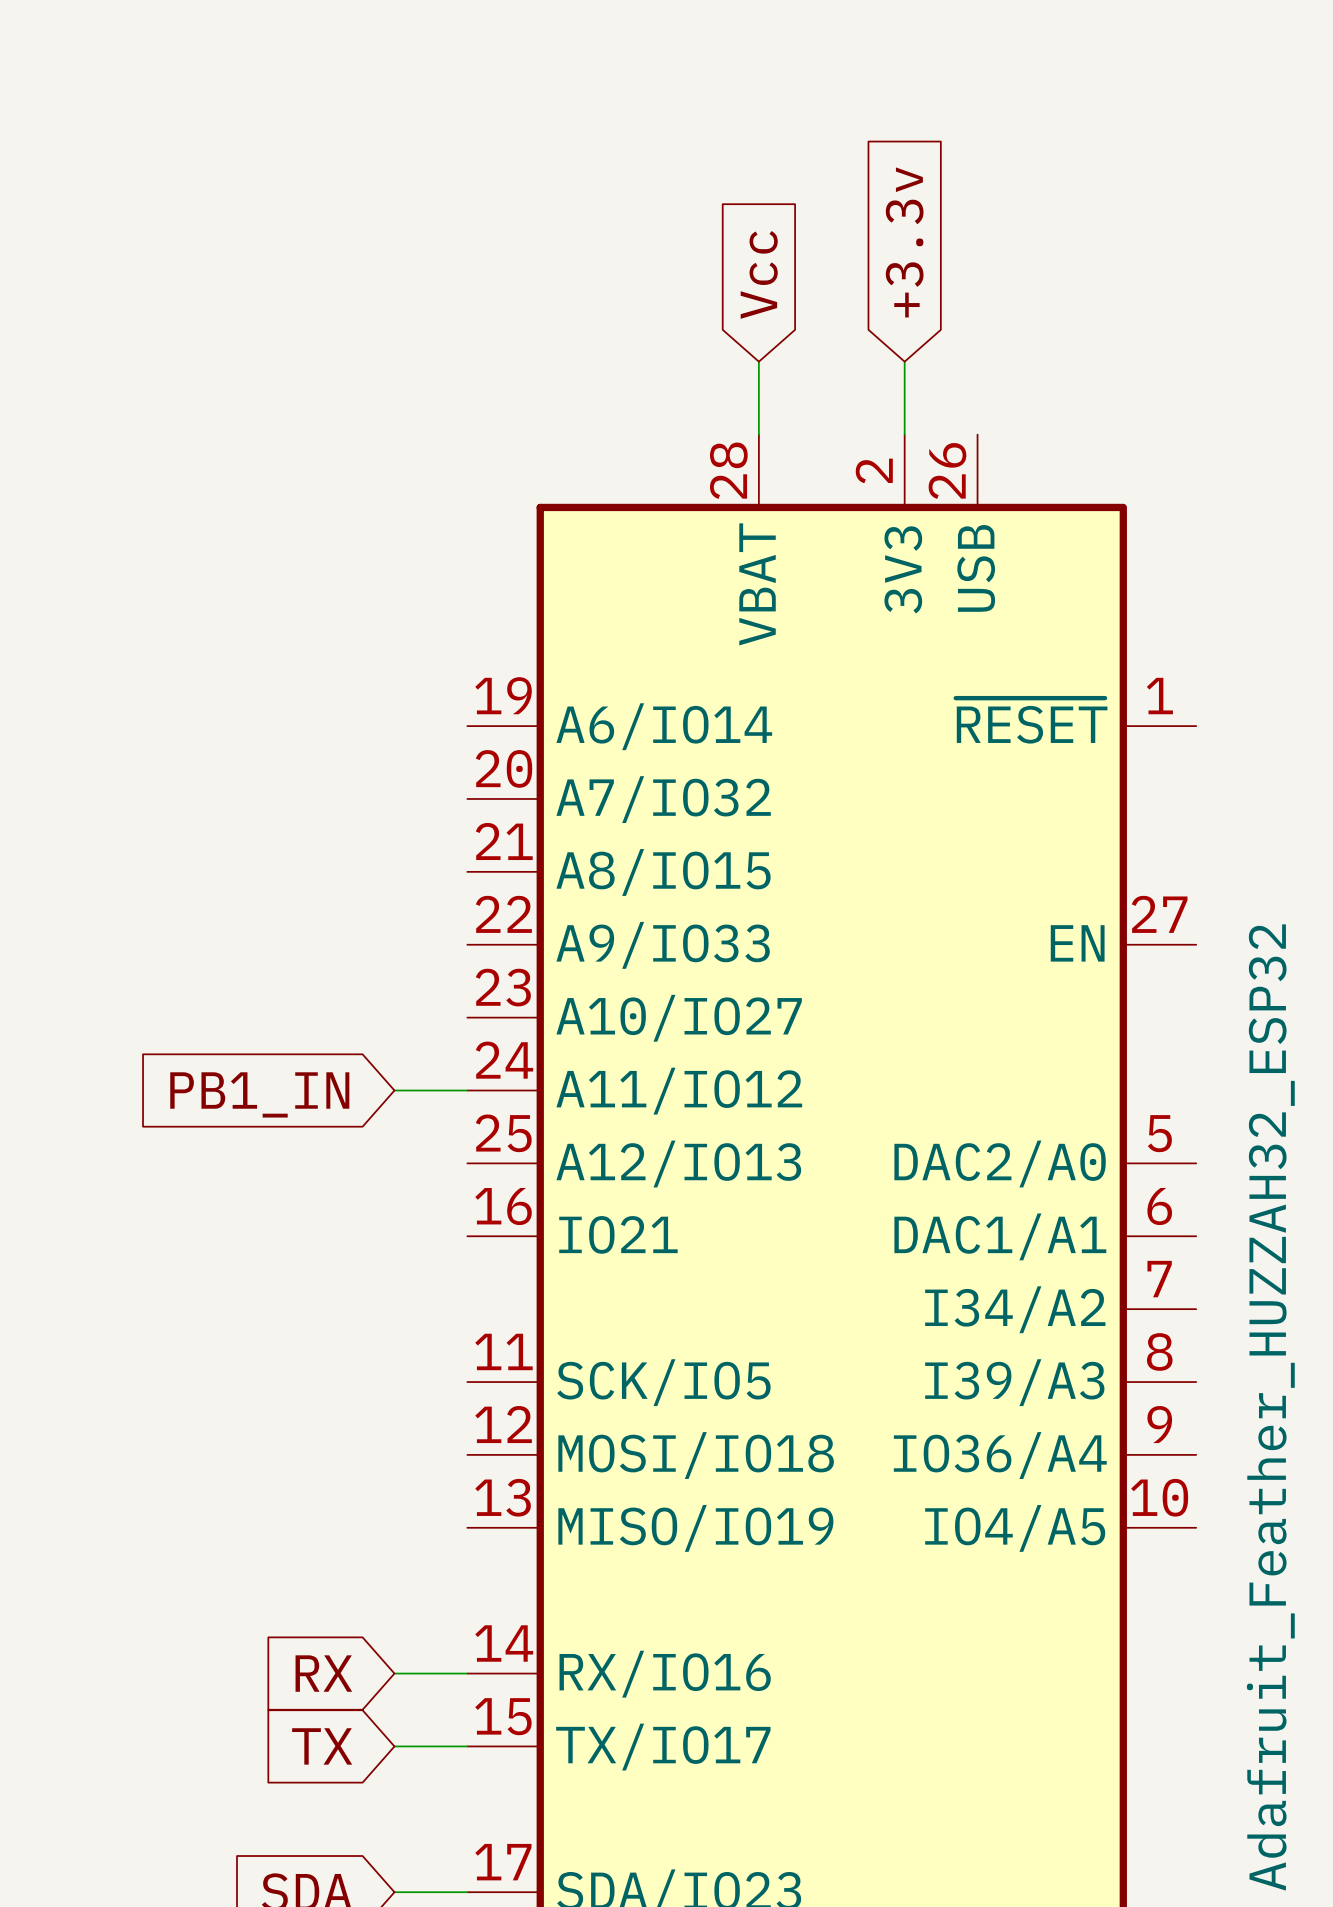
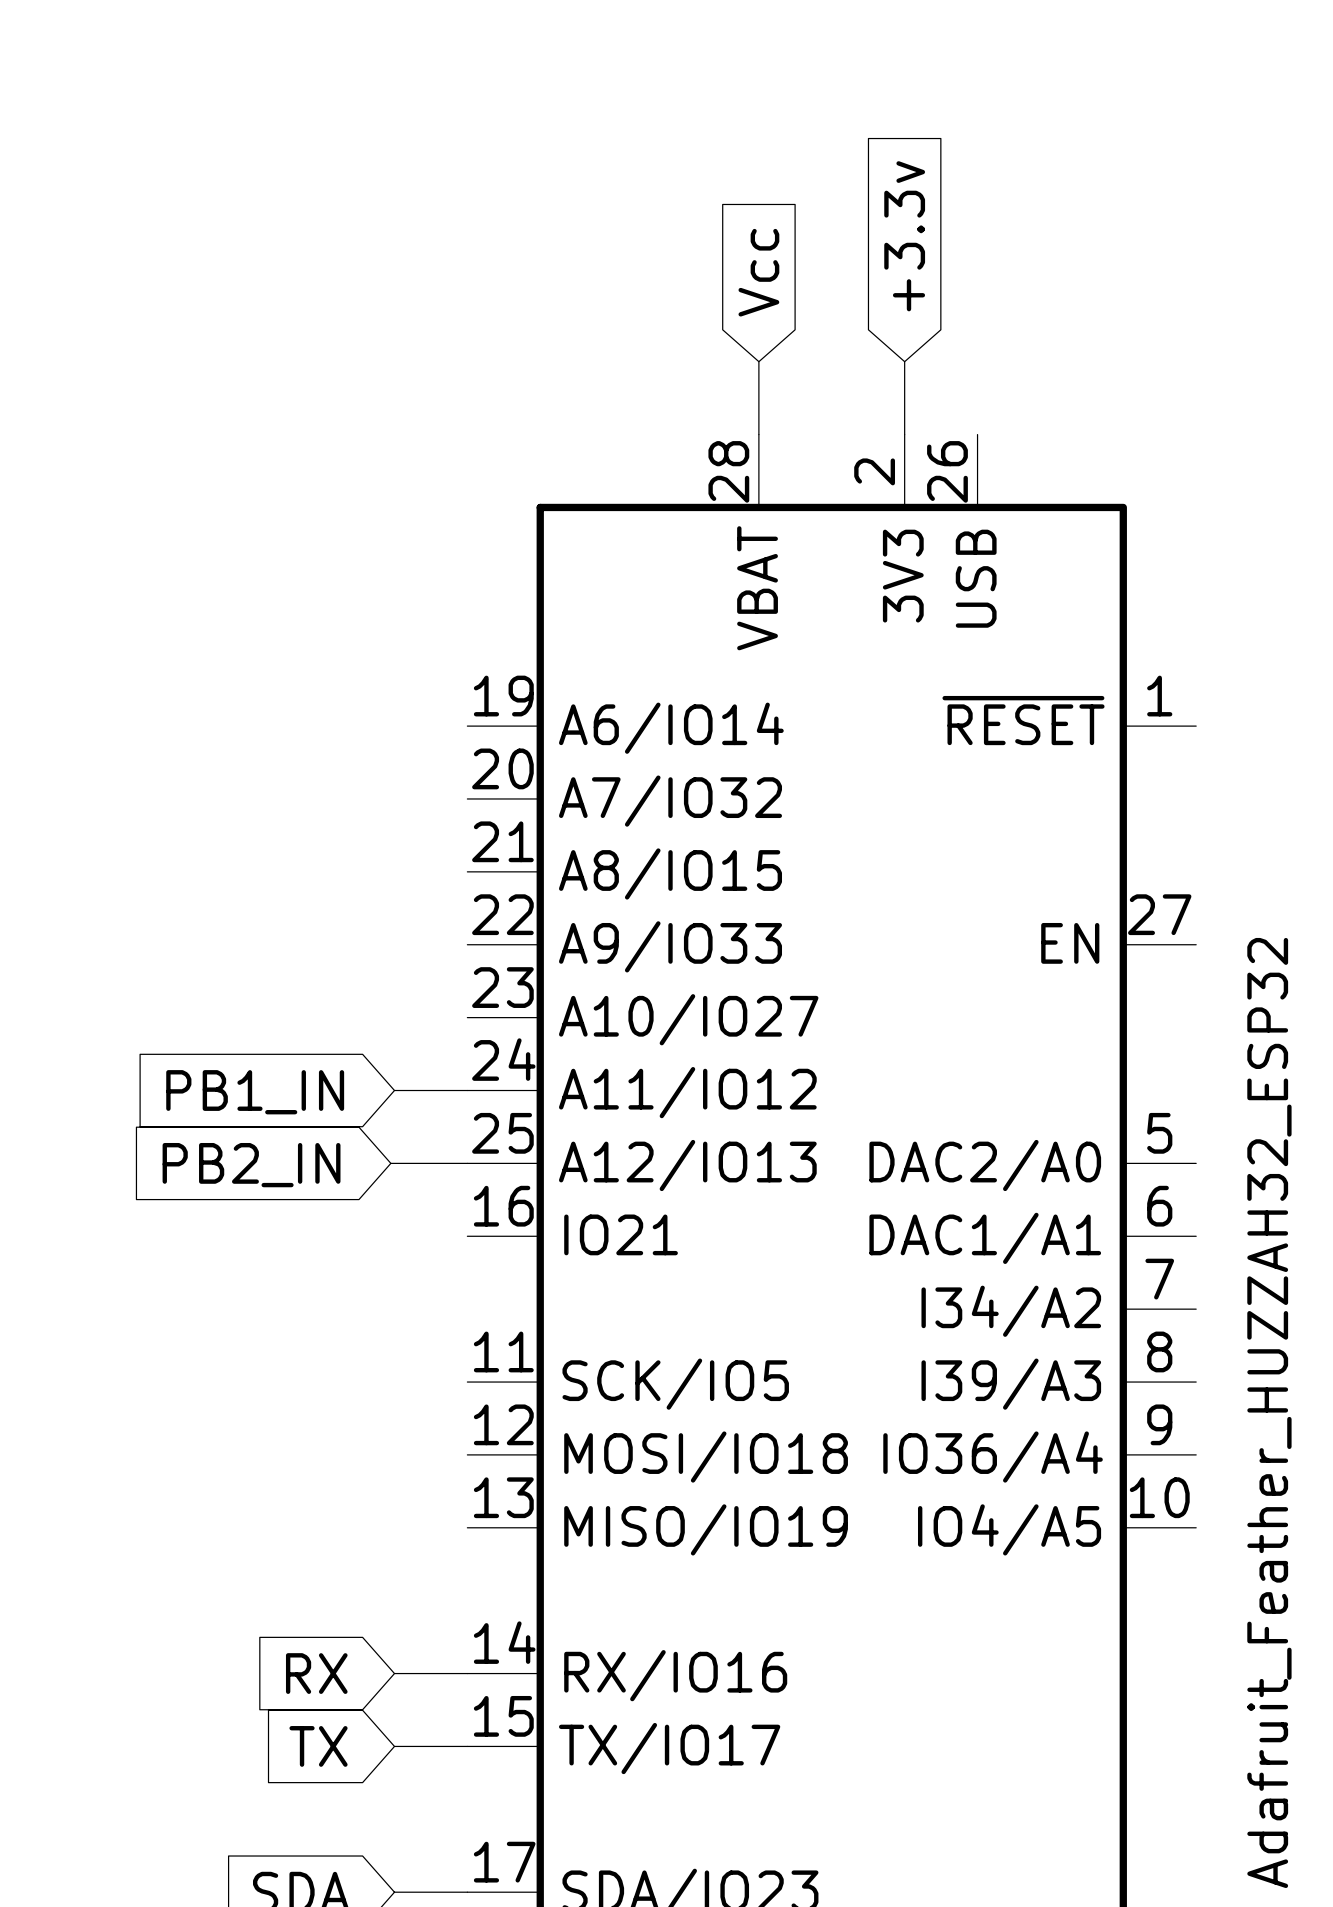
wire: none -> (390, 1163) (467, 1163)
global label: none -> PB2_IN (251, 1165)

